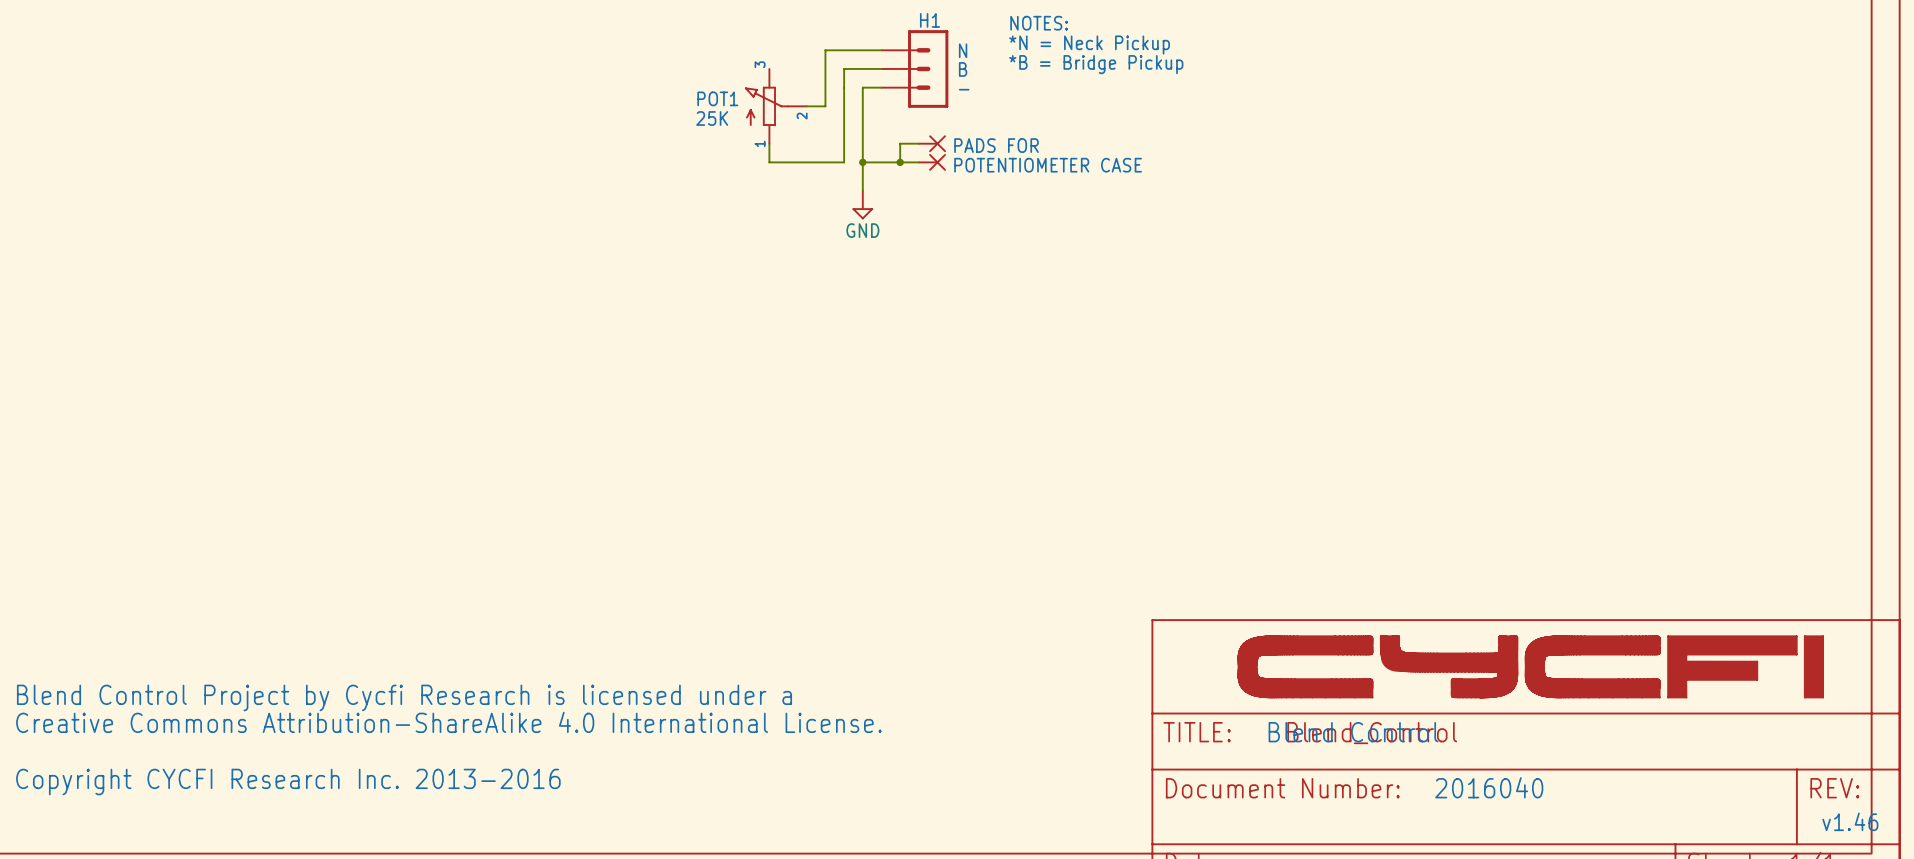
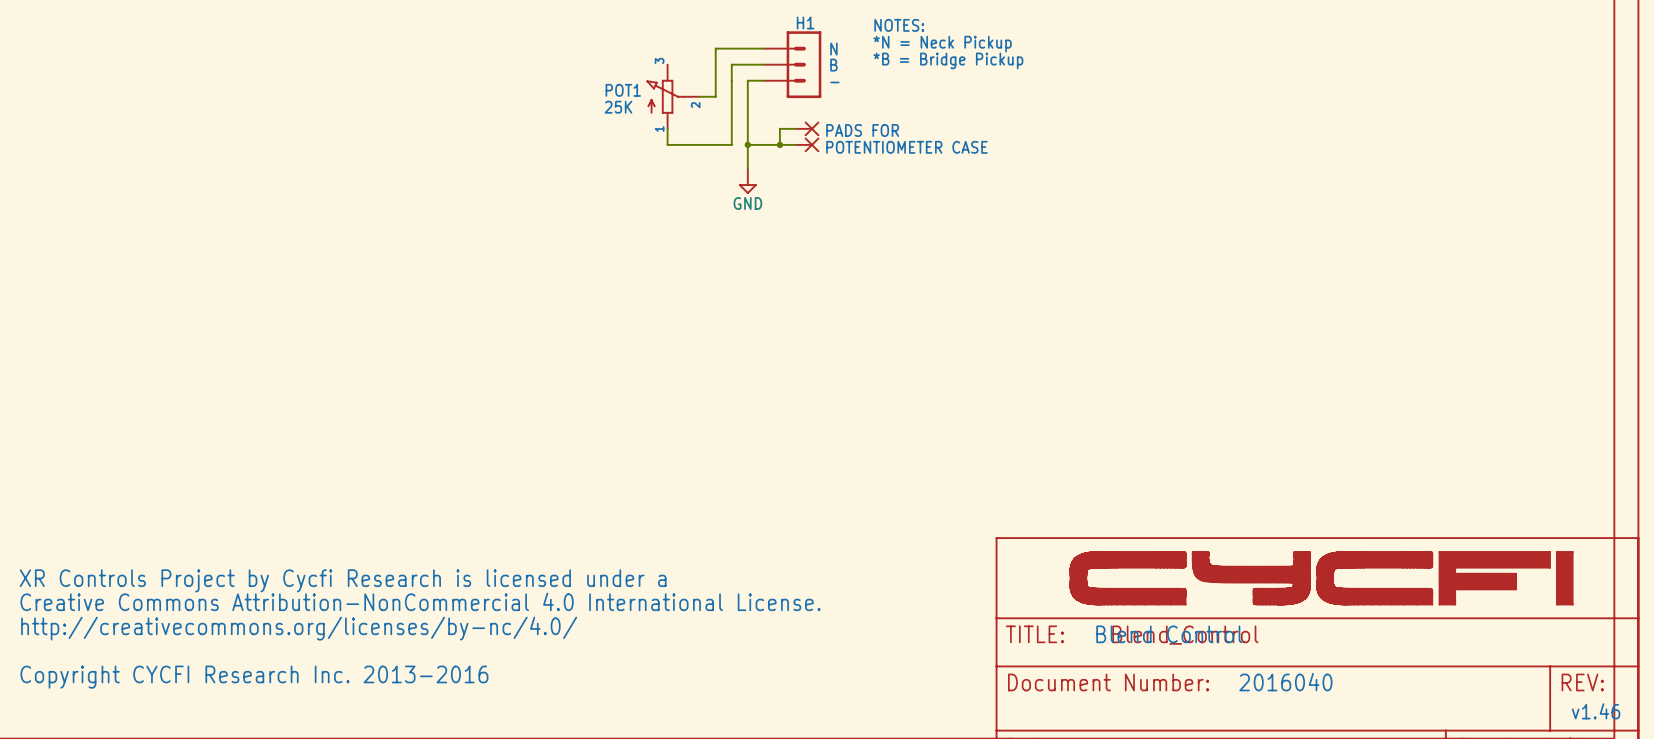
text: none -> XR Controls Project by Cycfi Research is licensed under a (343, 580)
text: Blend Control Project by Cycfi Research is licensed under a (404, 697) -> Creative Commons Attribution-NonCommercial 4.0 International License. (420, 601)
text: Creative Commons Attribution-ShareAlike 4.0 International License. (448, 722) -> http://creativecommons.org/licenses/by-nc/4.0/ (299, 628)

